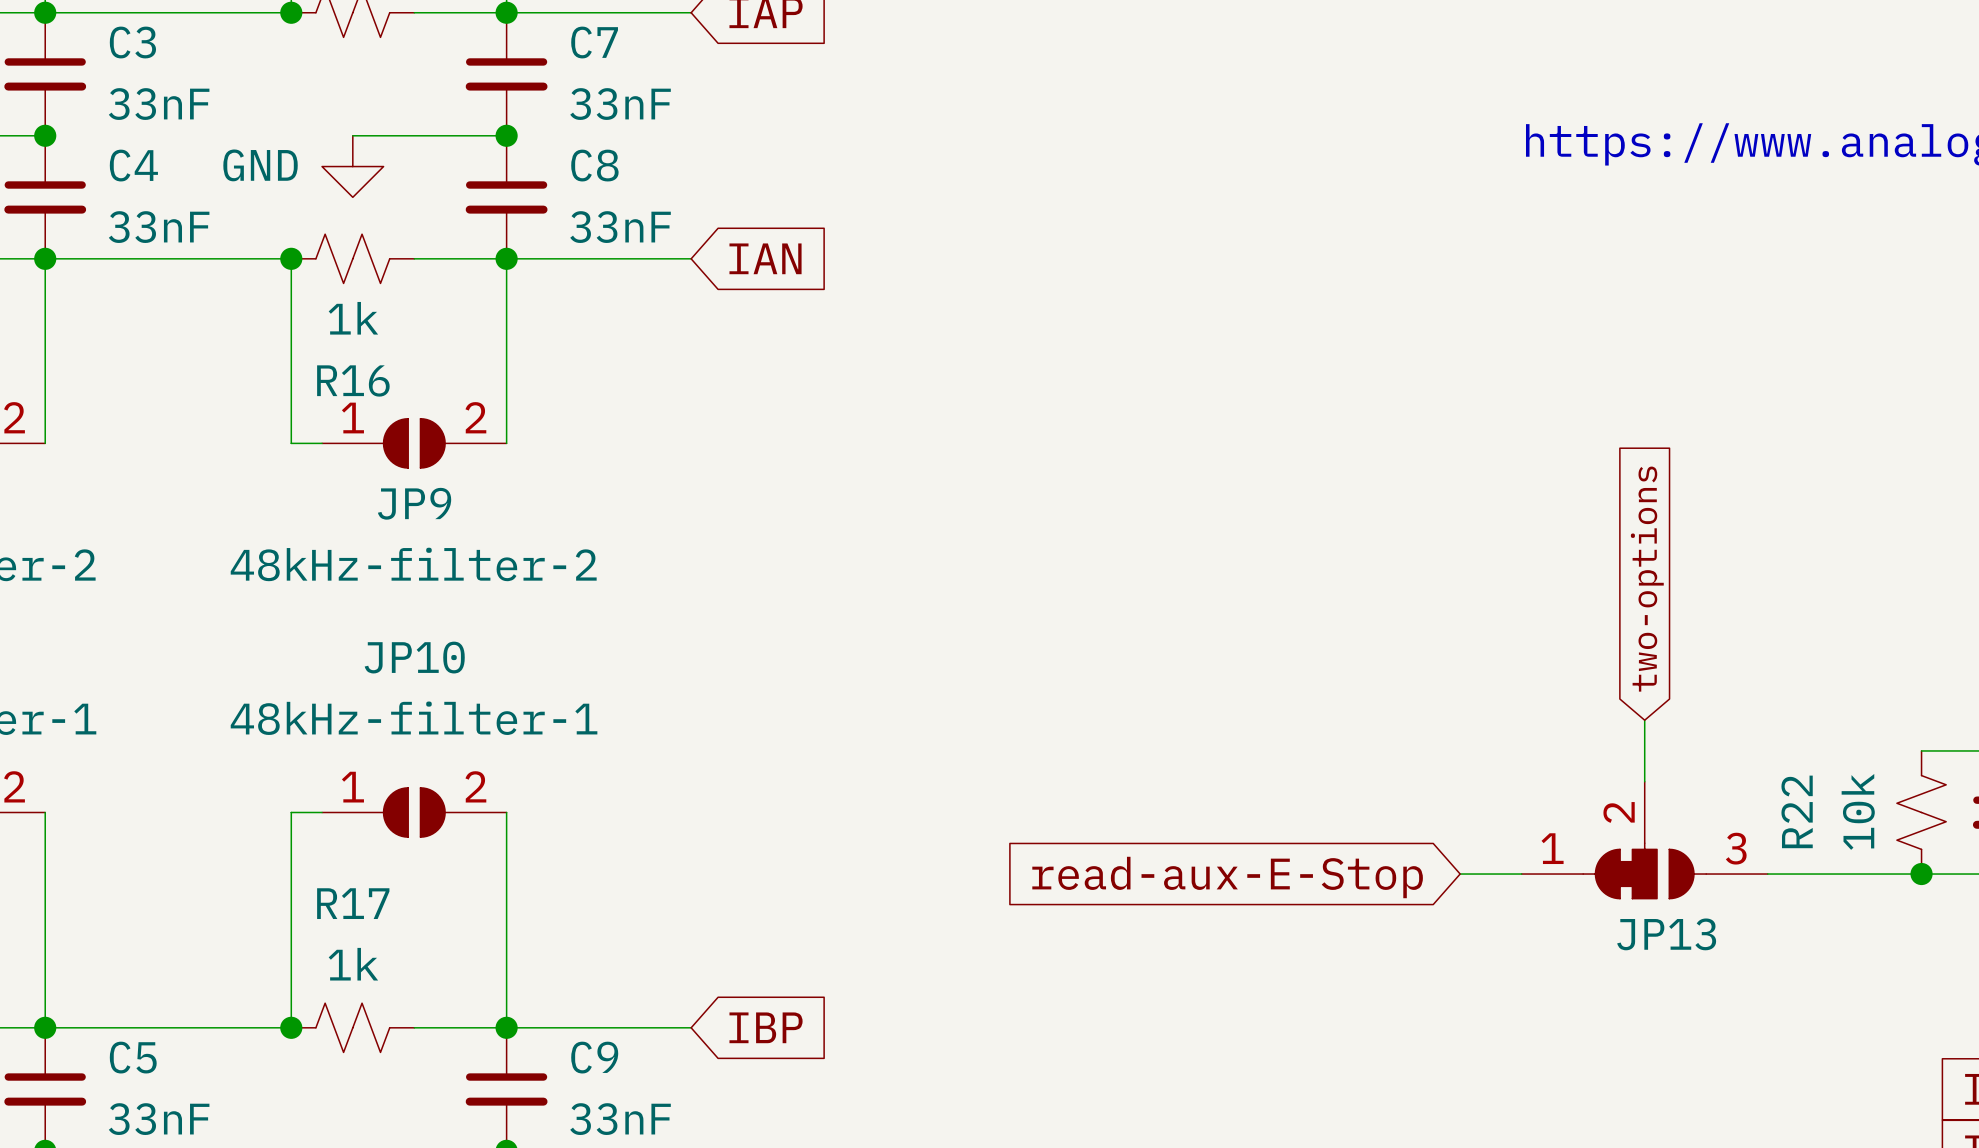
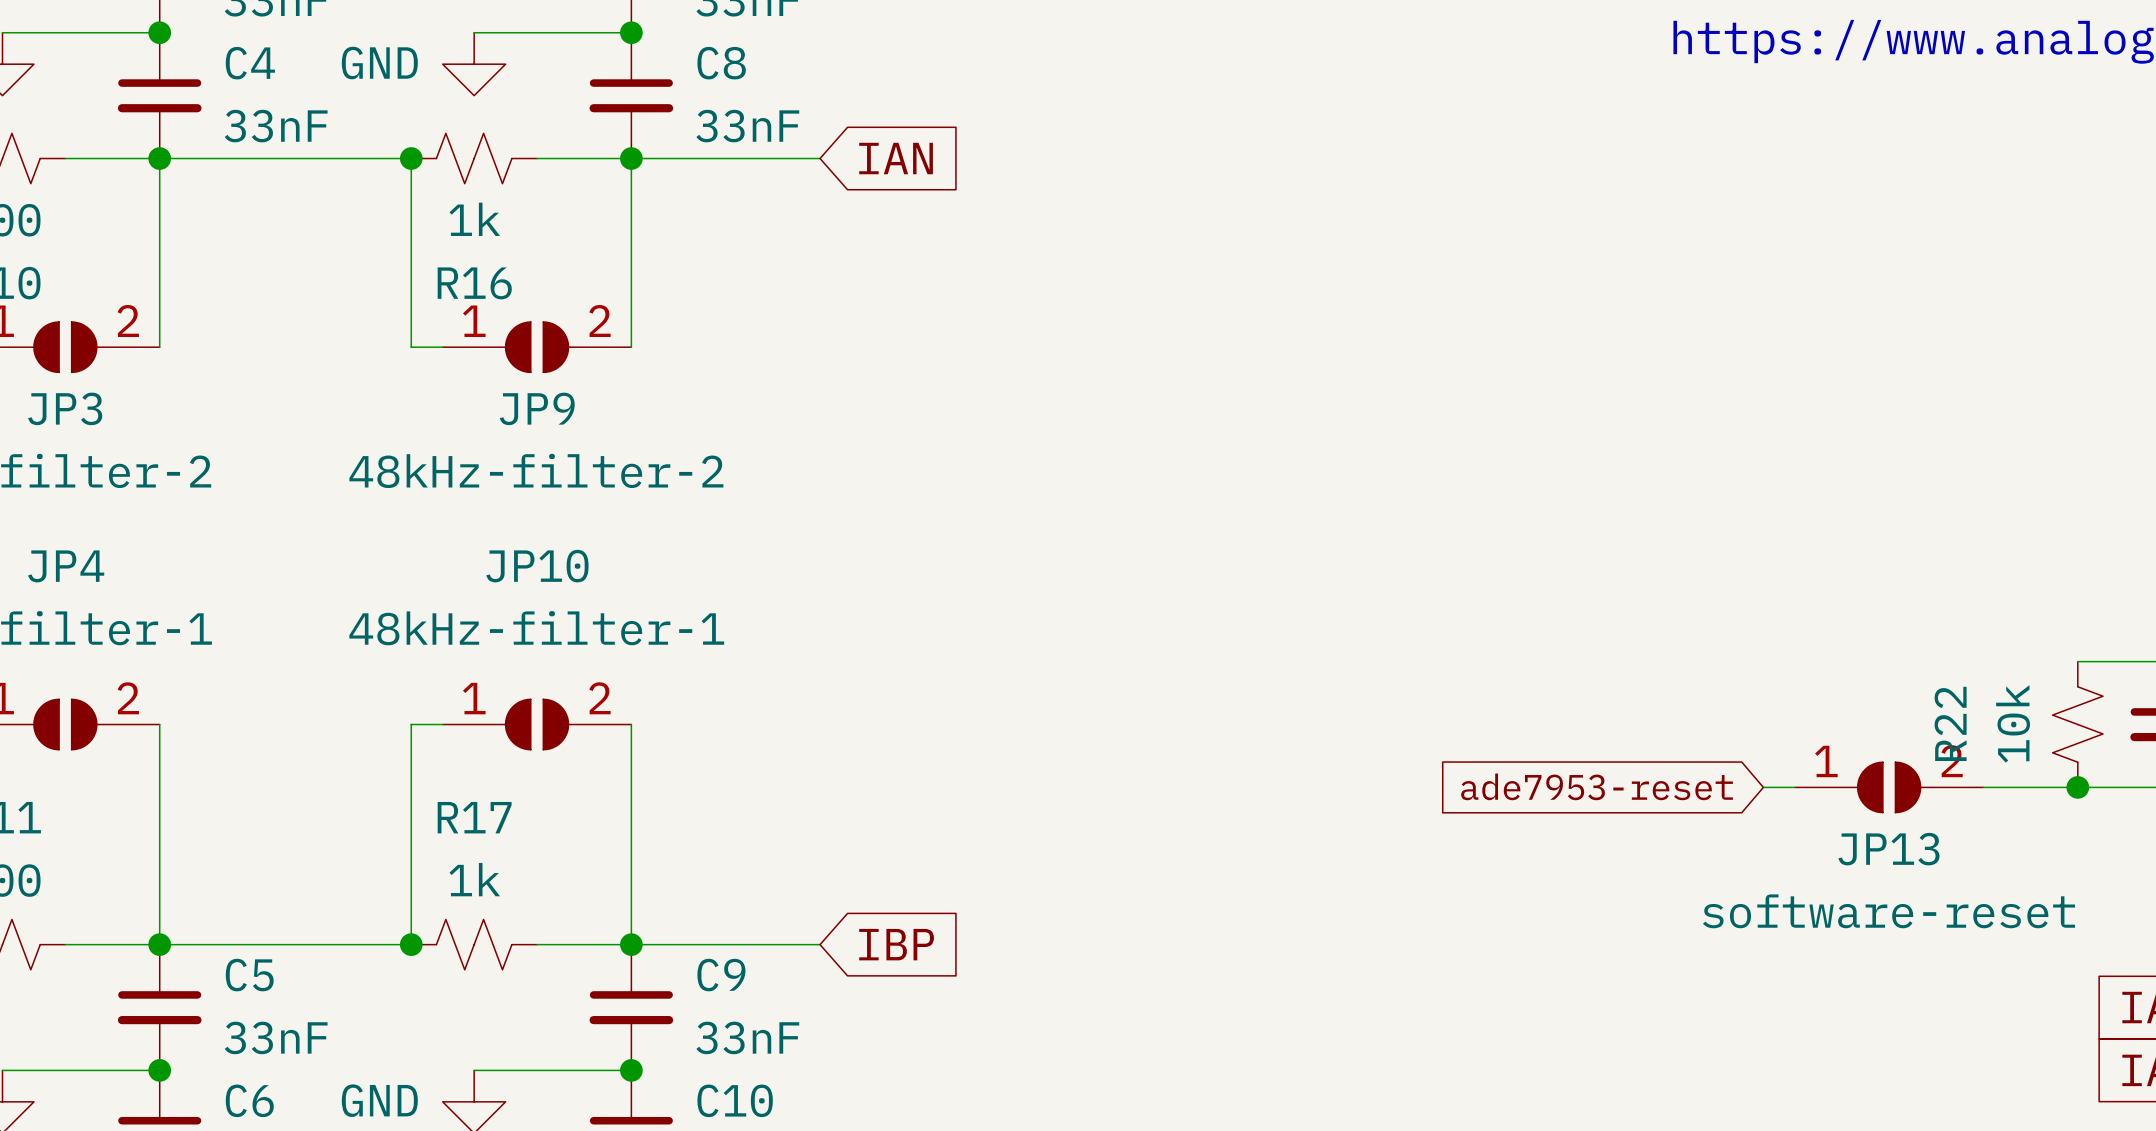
global label: two-options (1647, 579) -> none
wire: (1644, 720) (1644, 781) -> none
JP13 symbol: [1521, 781, 1768, 899] -> [1794, 762, 1984, 813]
global label: none -> ade7953-reset (1597, 786)
wire: (1460, 874) (1521, 874) -> none
global label: read-aux-E-Stop (1227, 877) -> none
JP13 name position: JP13 (1666, 934) -> JP13 (1888, 849)
JP13 value: none -> software-reset (1888, 911)

